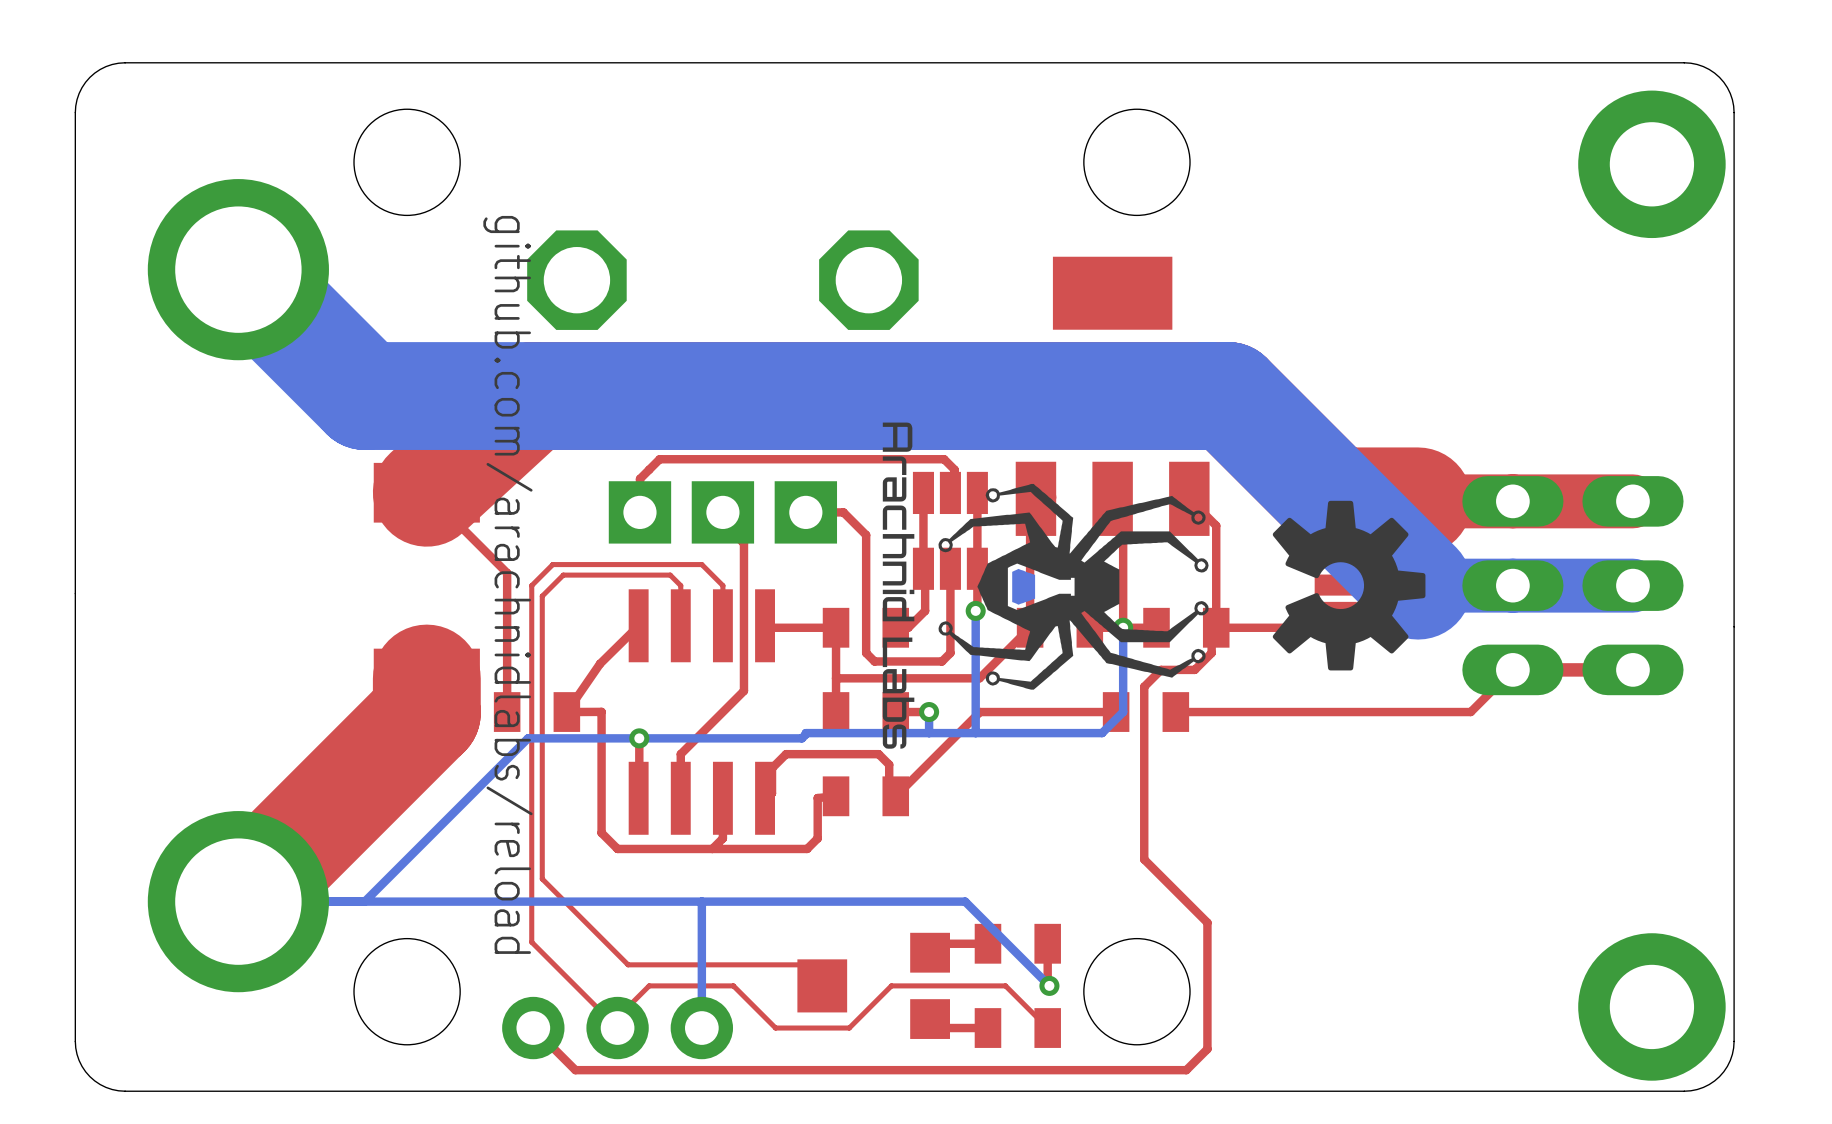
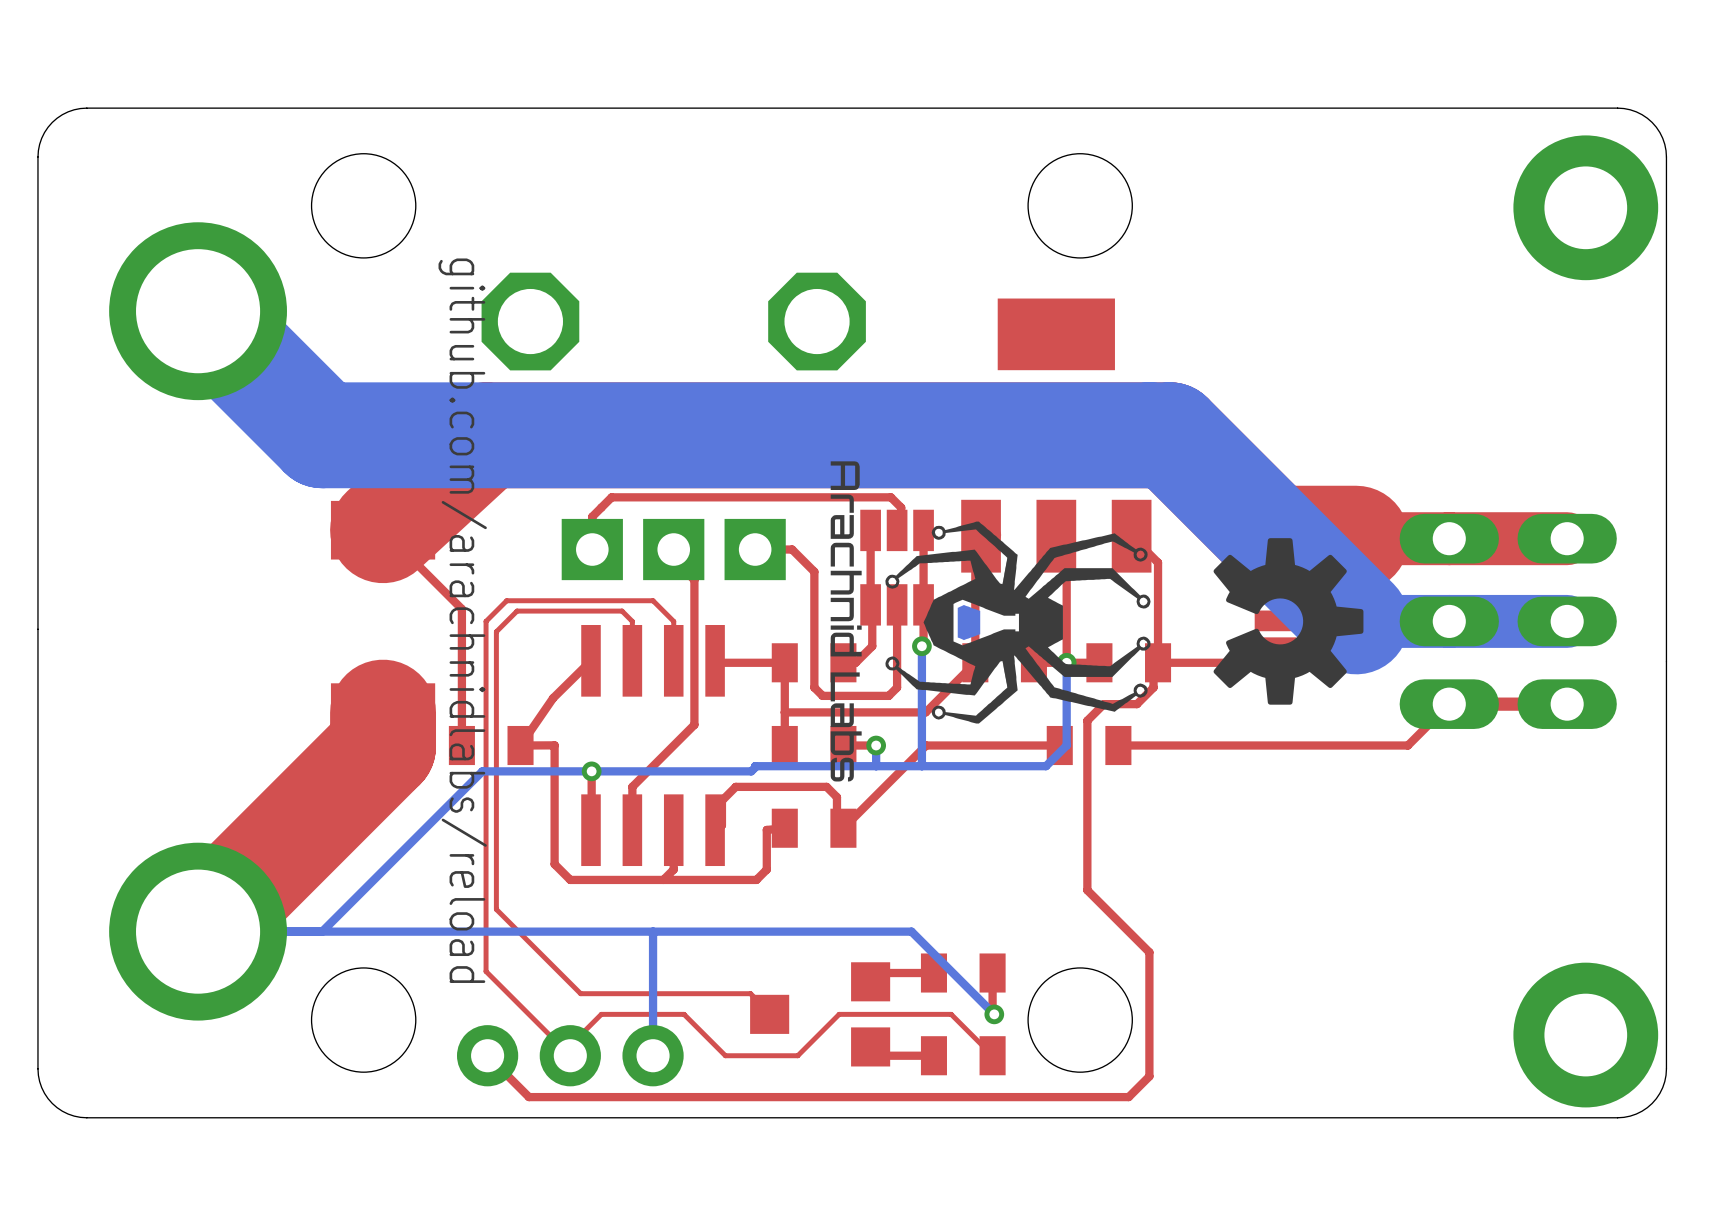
part footprint: [797, 932, 950, 1039] -> [750, 962, 891, 1067]

